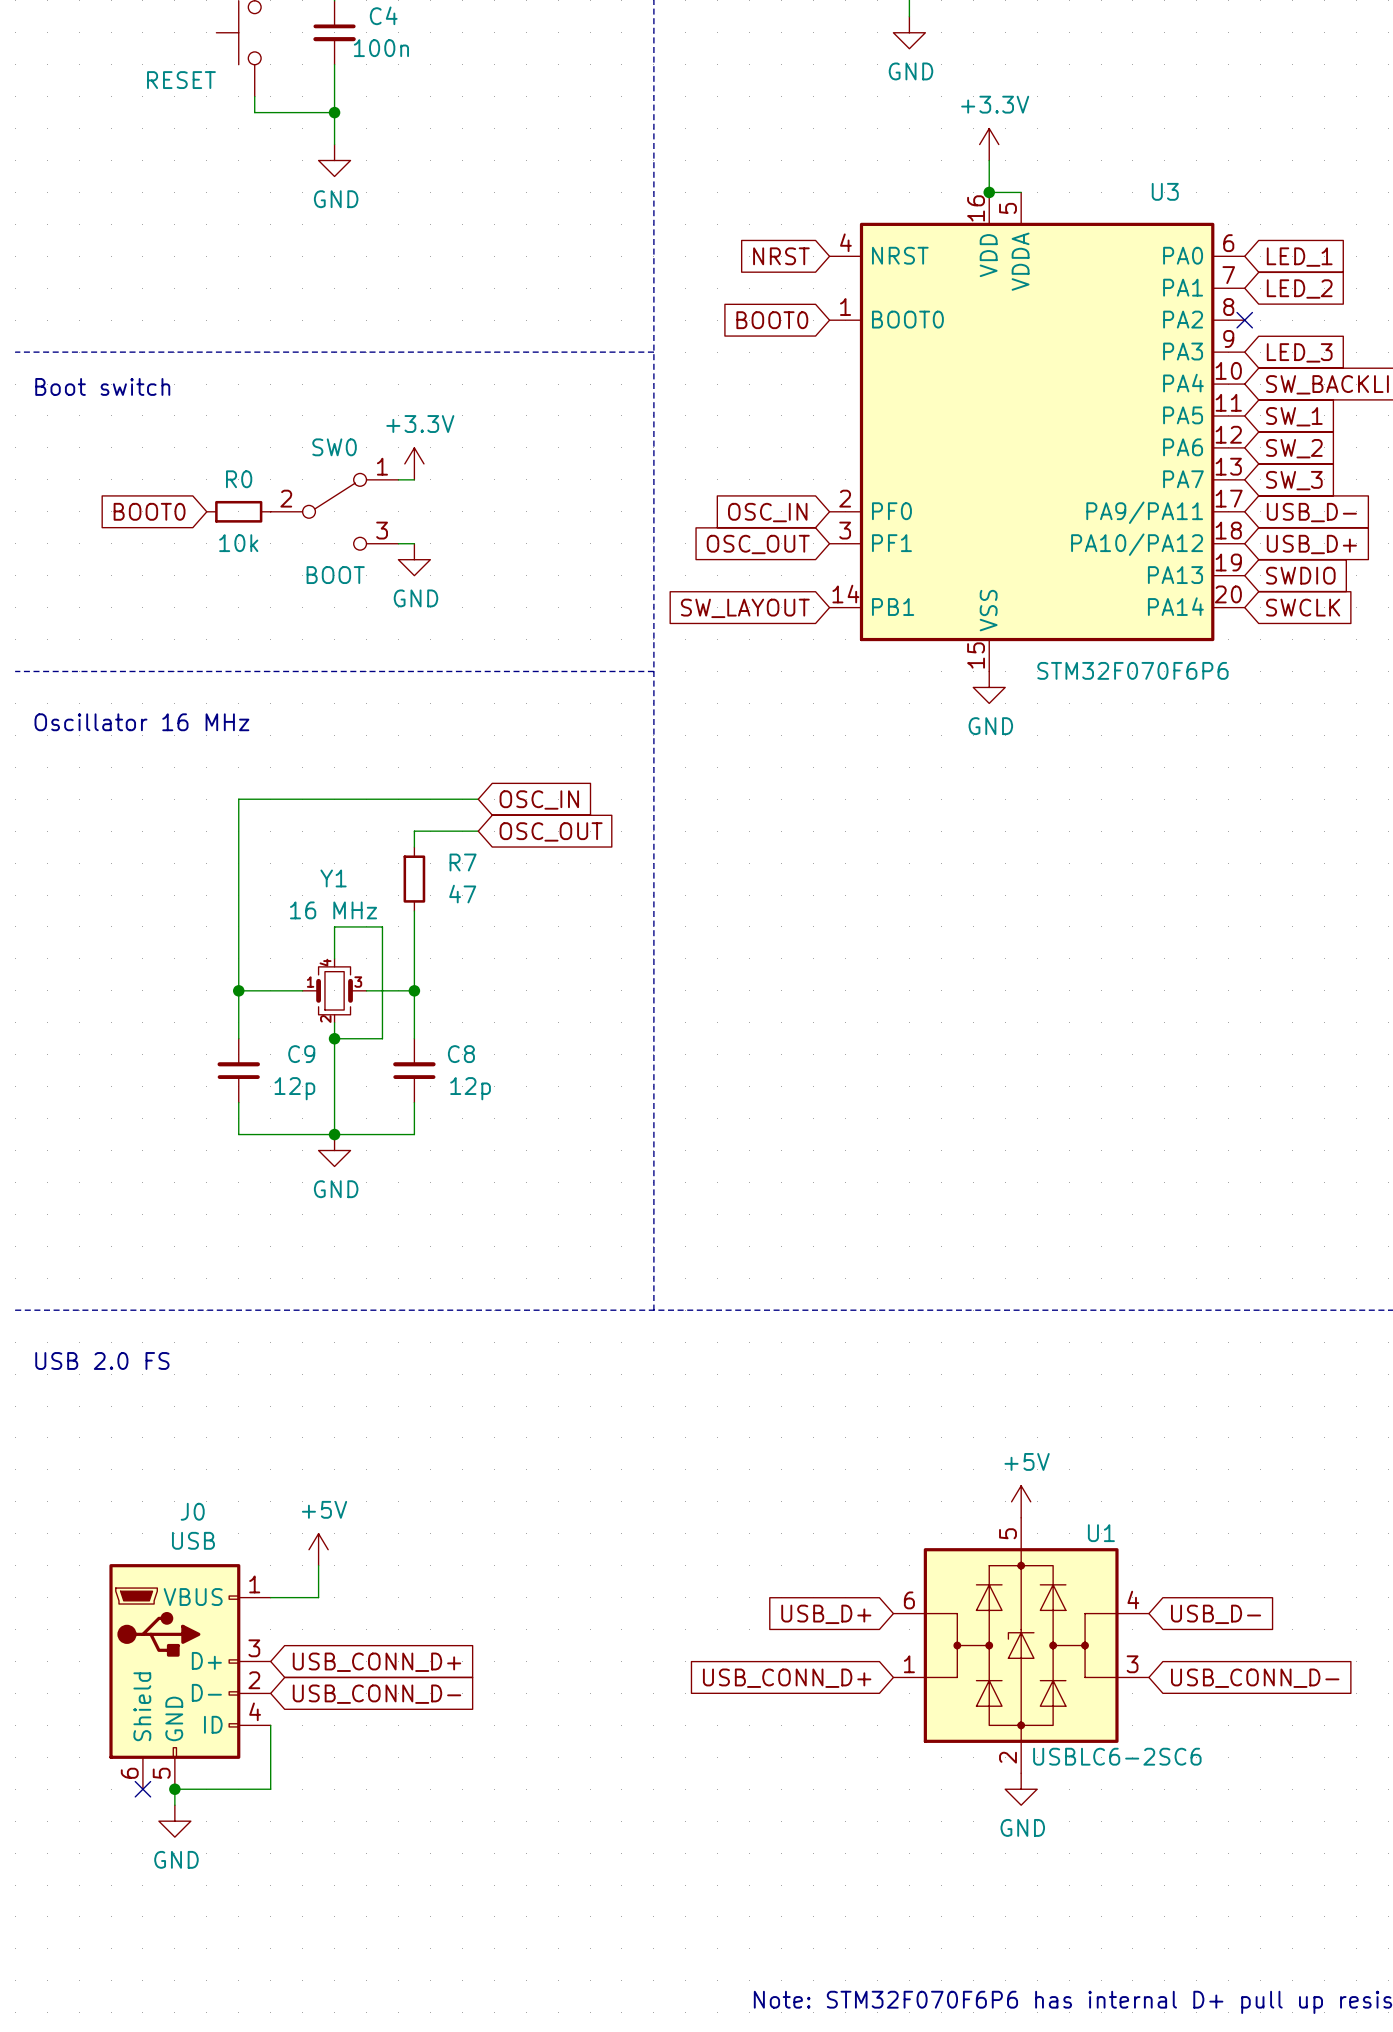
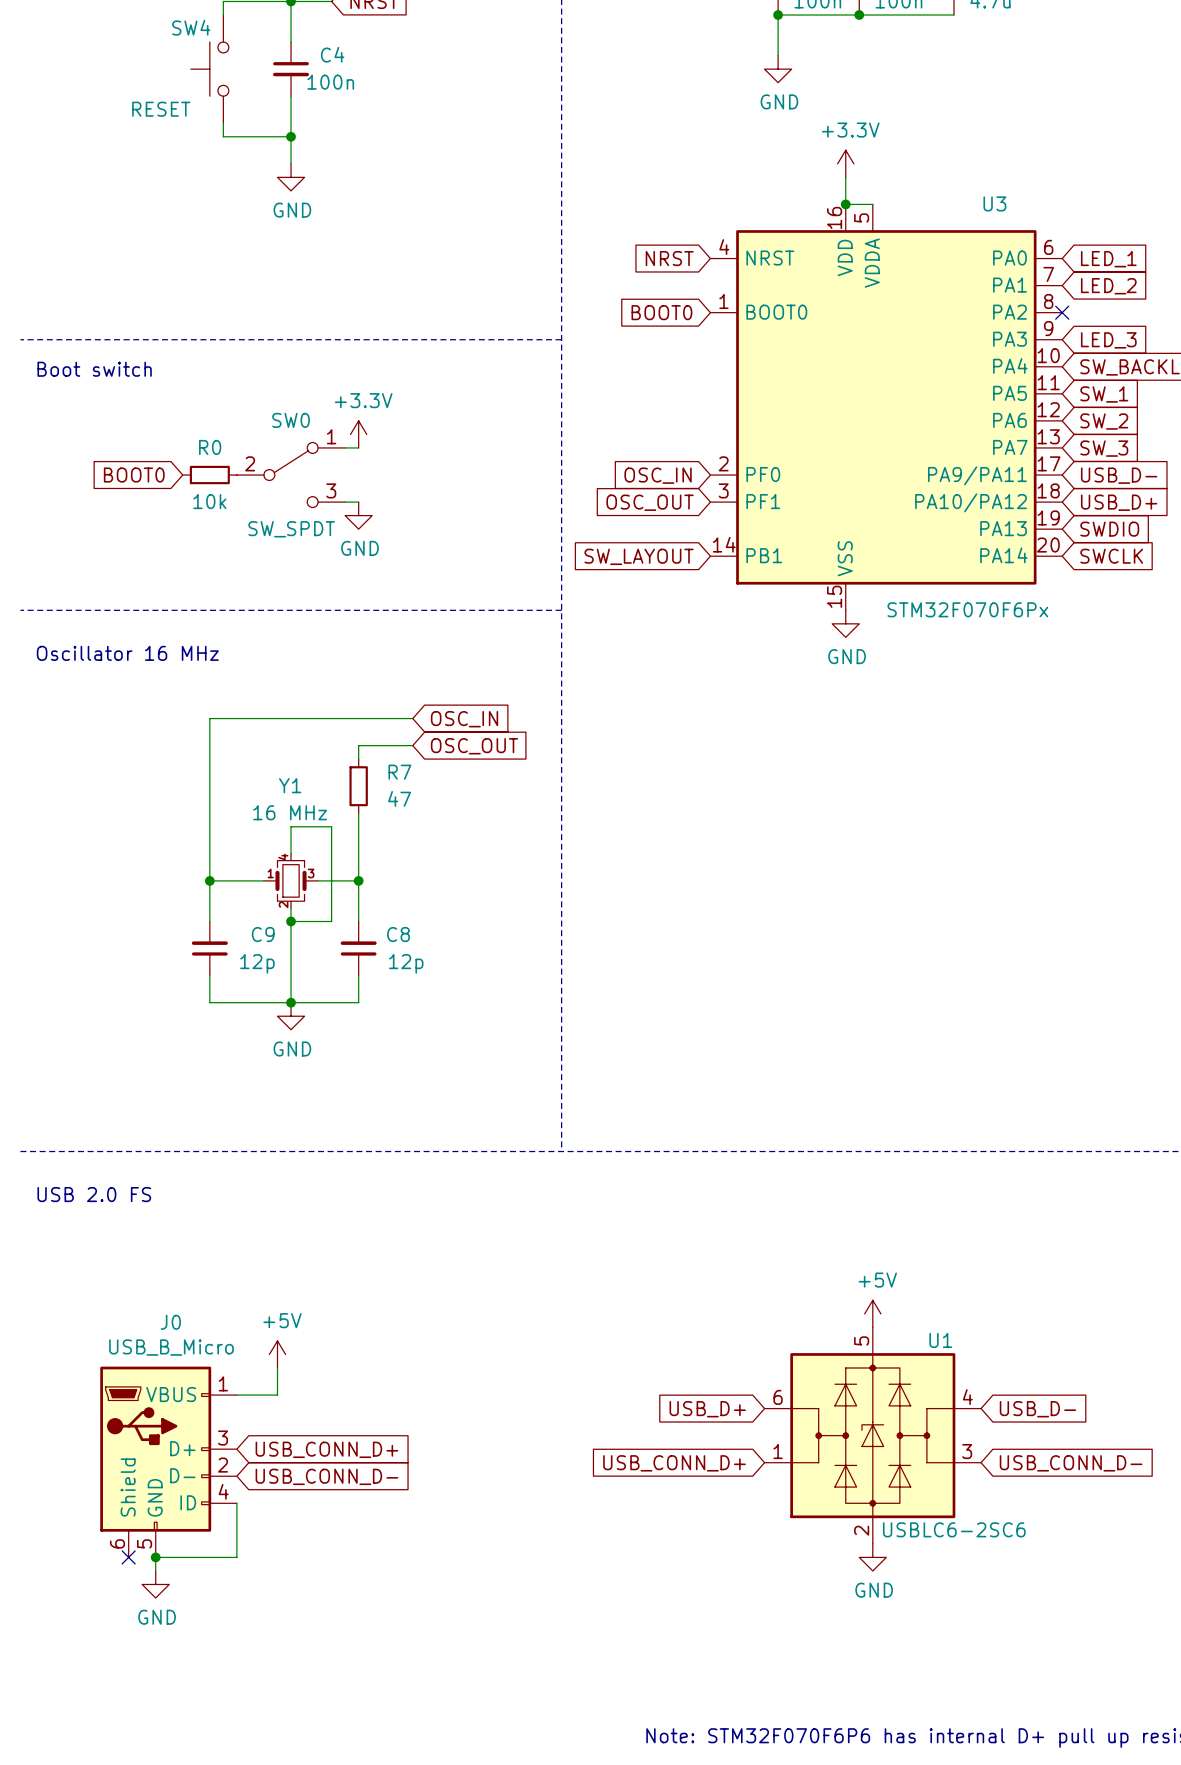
SW0 value: BOOT (335, 575) -> SW_SPDT (291, 529)
U3 value: STM32F070F6P6 (1132, 670) -> STM32F070F6Px (967, 609)
J0 value: USB (193, 1540) -> USB_B_Micro (171, 1347)

